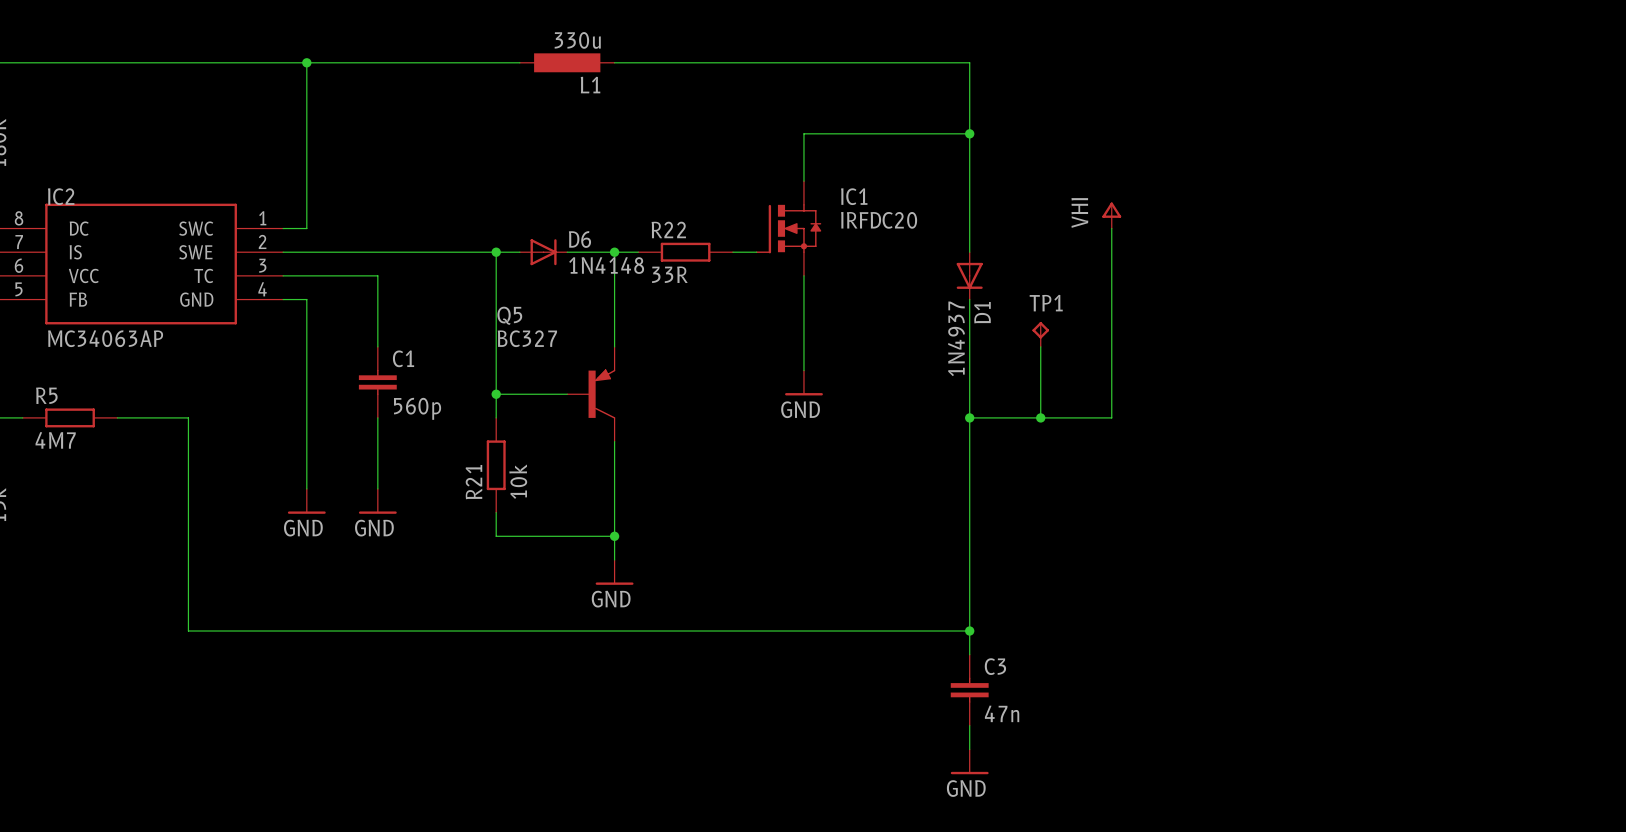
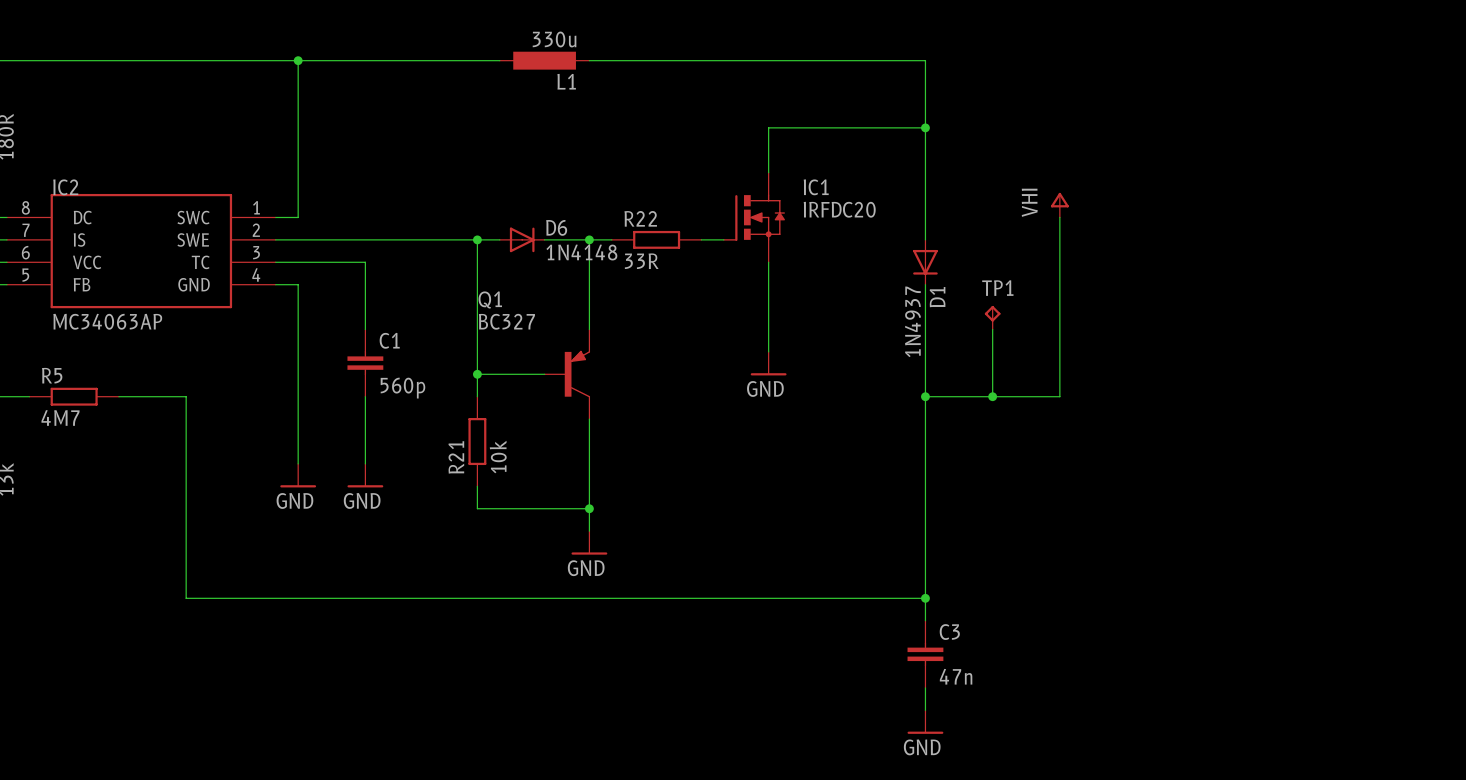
Q5 name: Q5 (509, 315) -> Q1 (490, 300)

